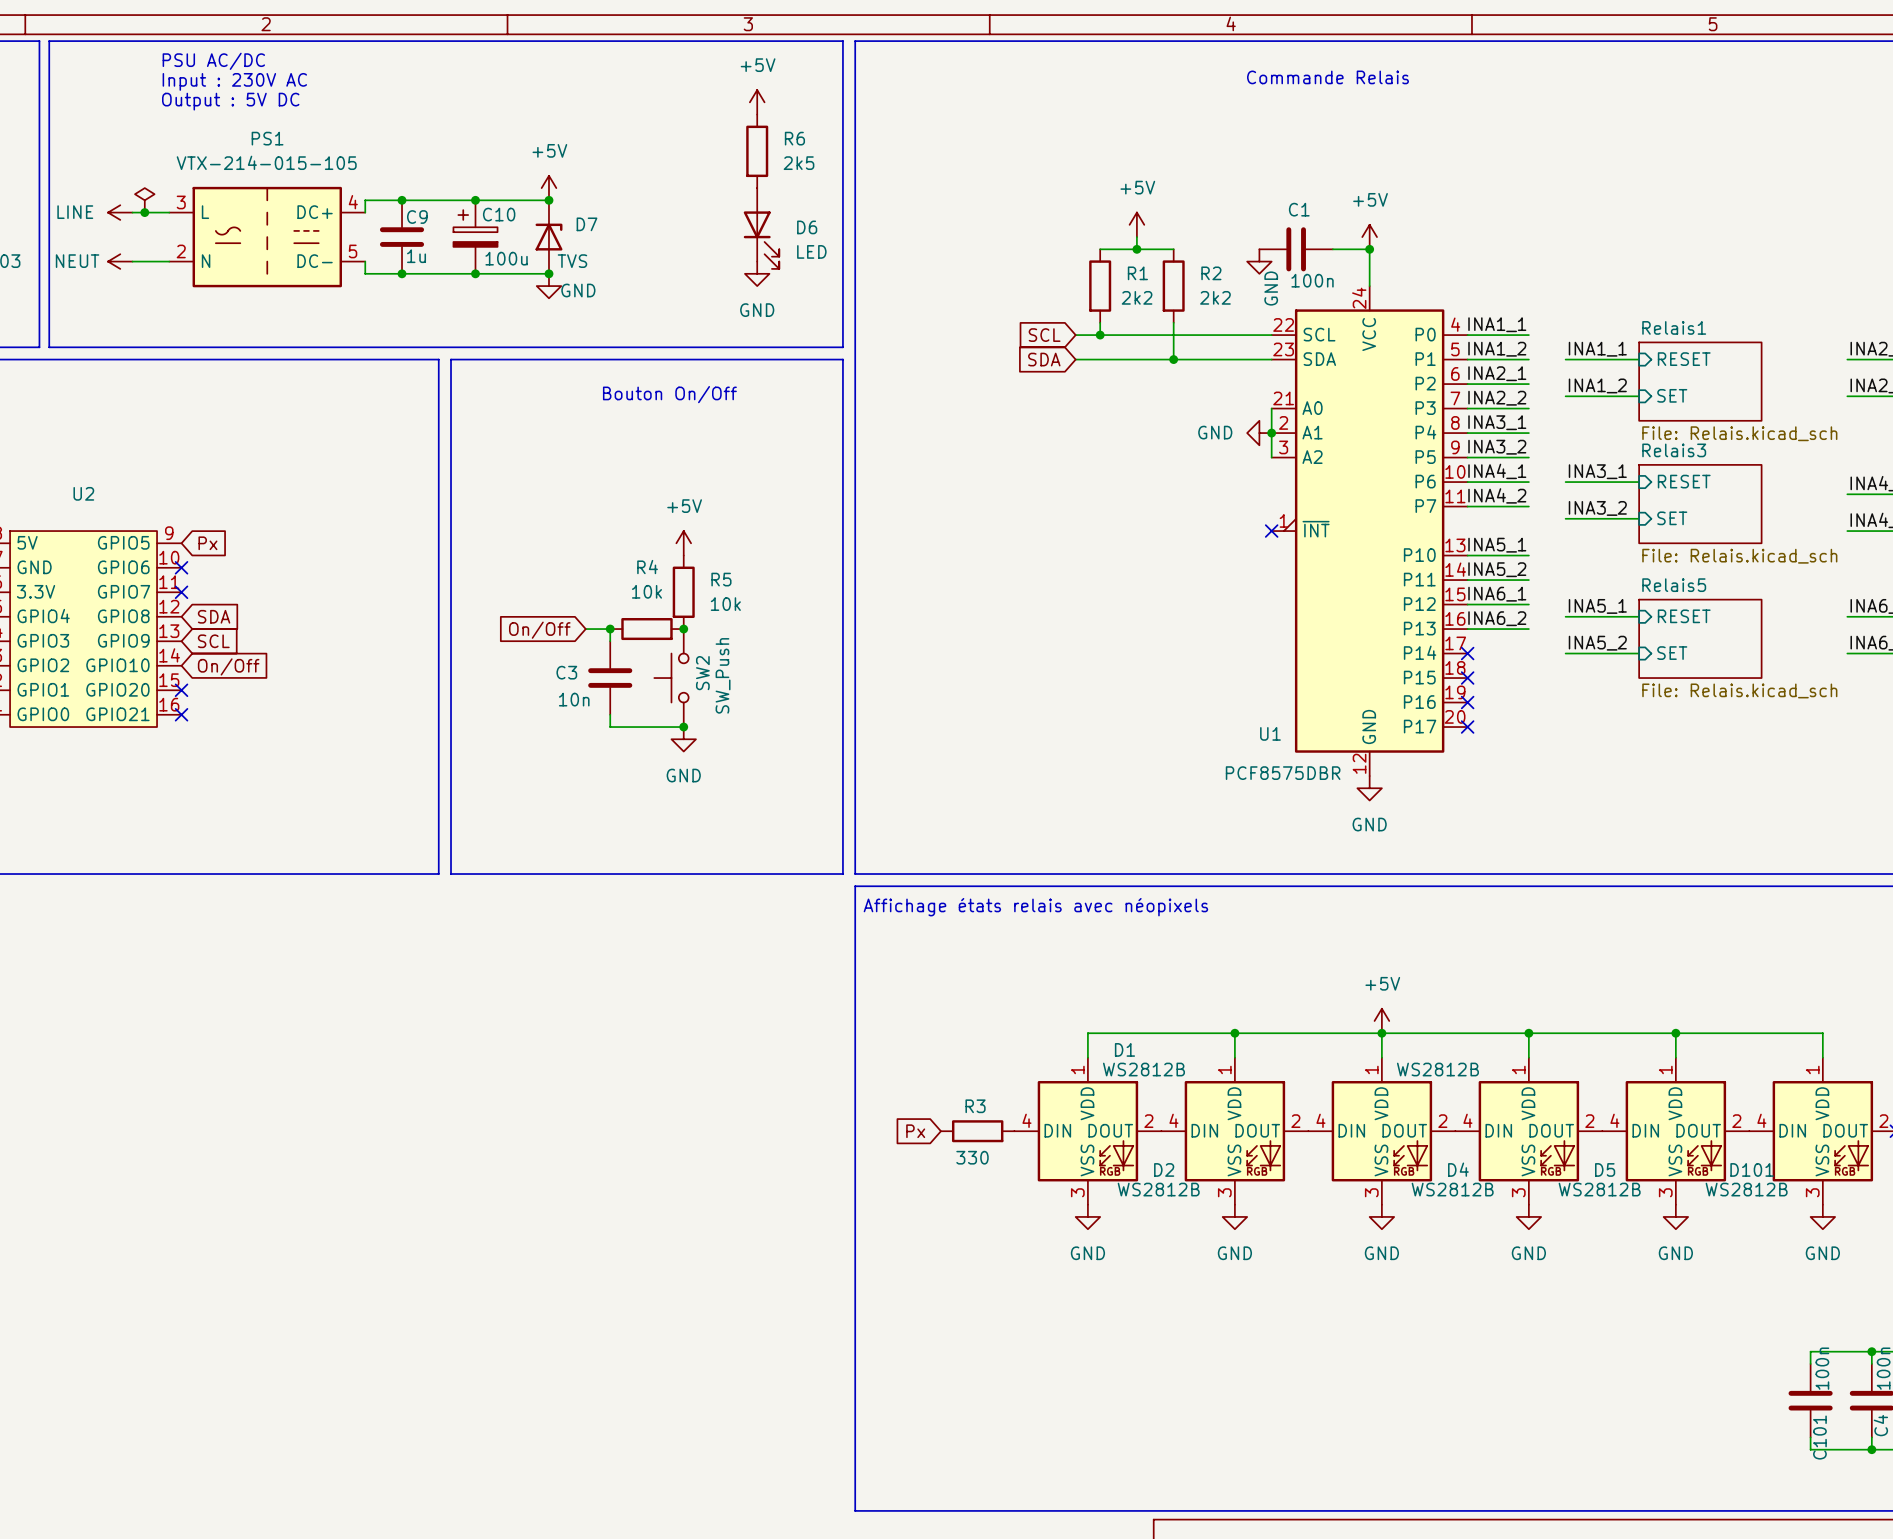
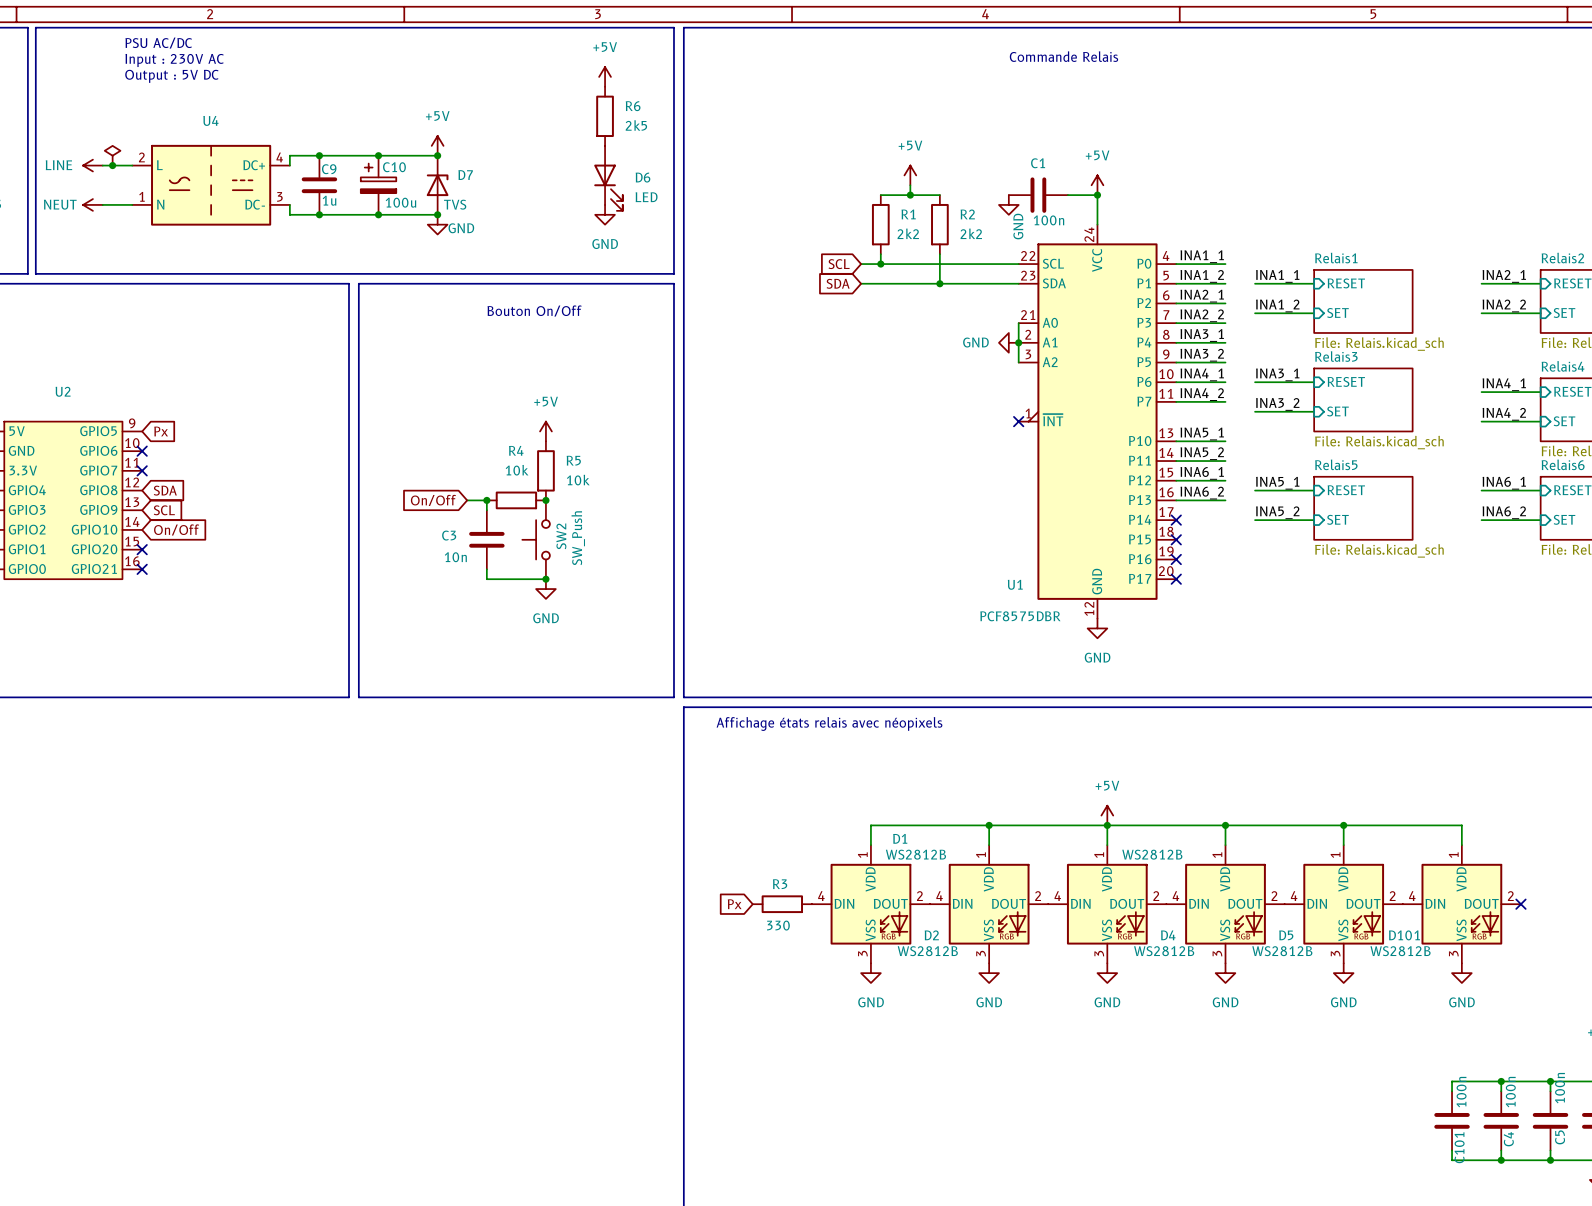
PS1 name: PS1 (267, 138) -> U4 (210, 120)
PS1 value: VTX-214-015-105 (266, 162) -> none
PS1 pin number: 3 (181, 202) -> 2 (141, 157)
PS1 pin number: 2 (181, 251) -> 1 (141, 196)
PS1 pin number: 5 (353, 251) -> 3 (279, 196)

